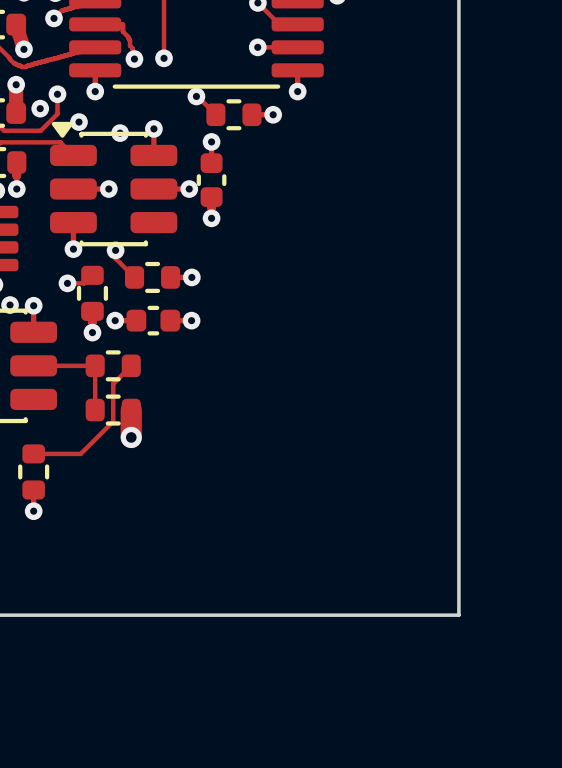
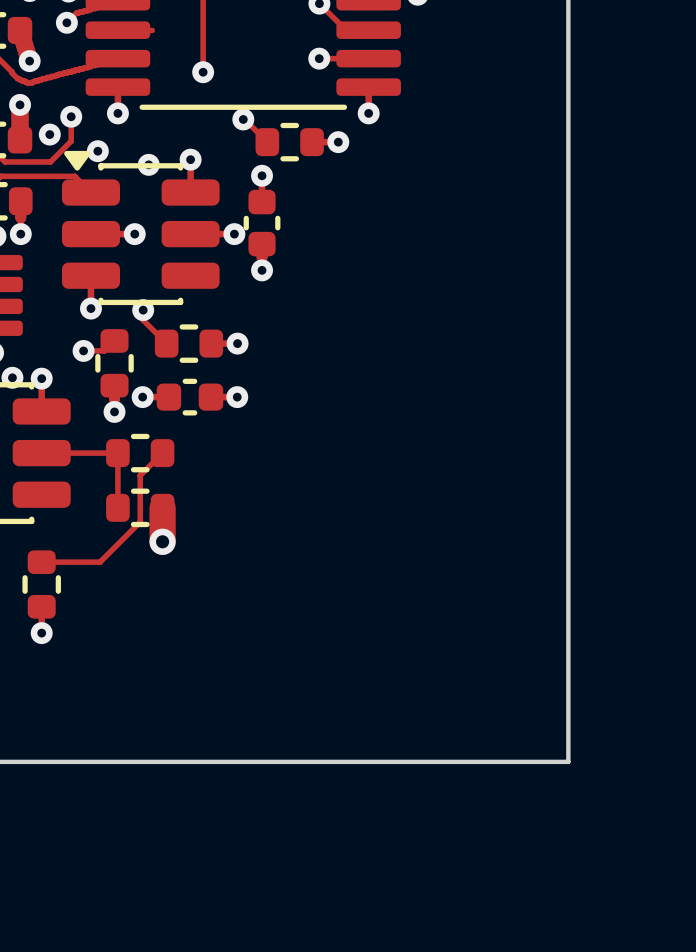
track: (122, 24) (122, 31) (130, 40) (134, 59) -> none
via: (134, 59) -> none

